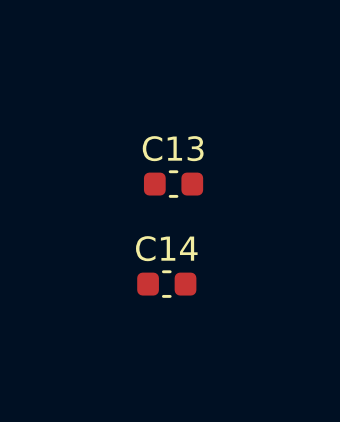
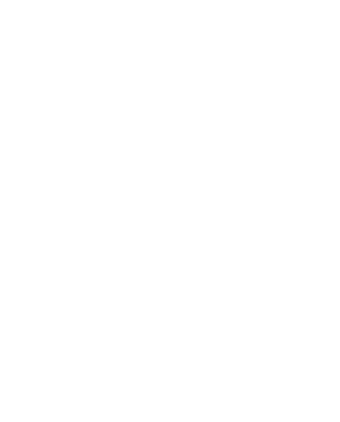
C13: (173, 184) -> none
C14: (166, 284) -> none

